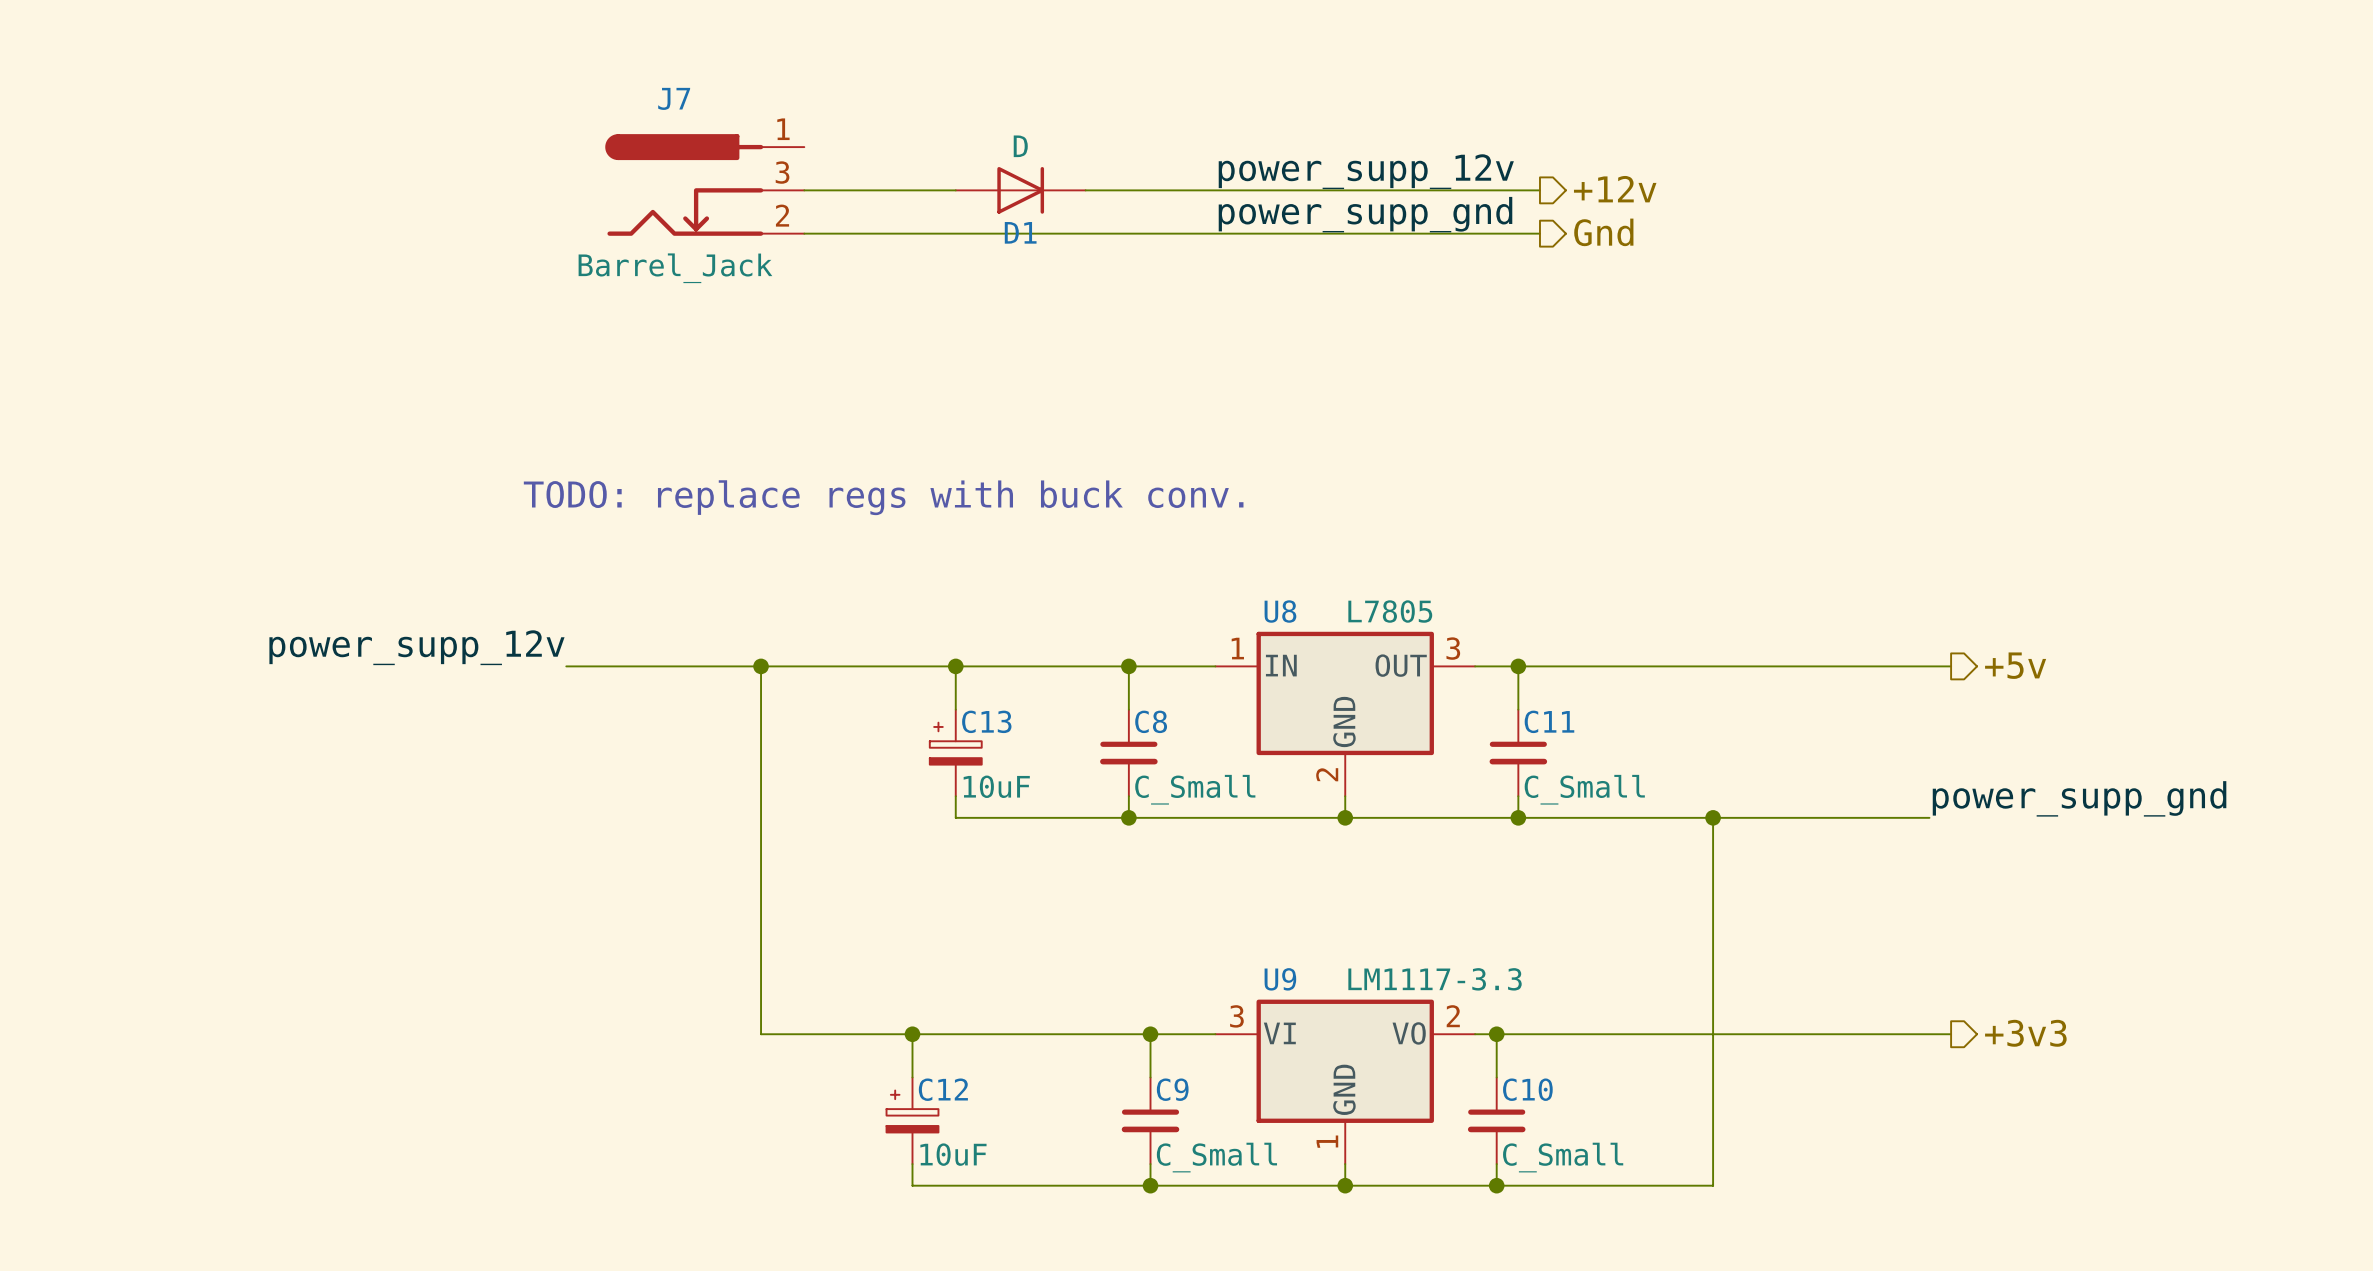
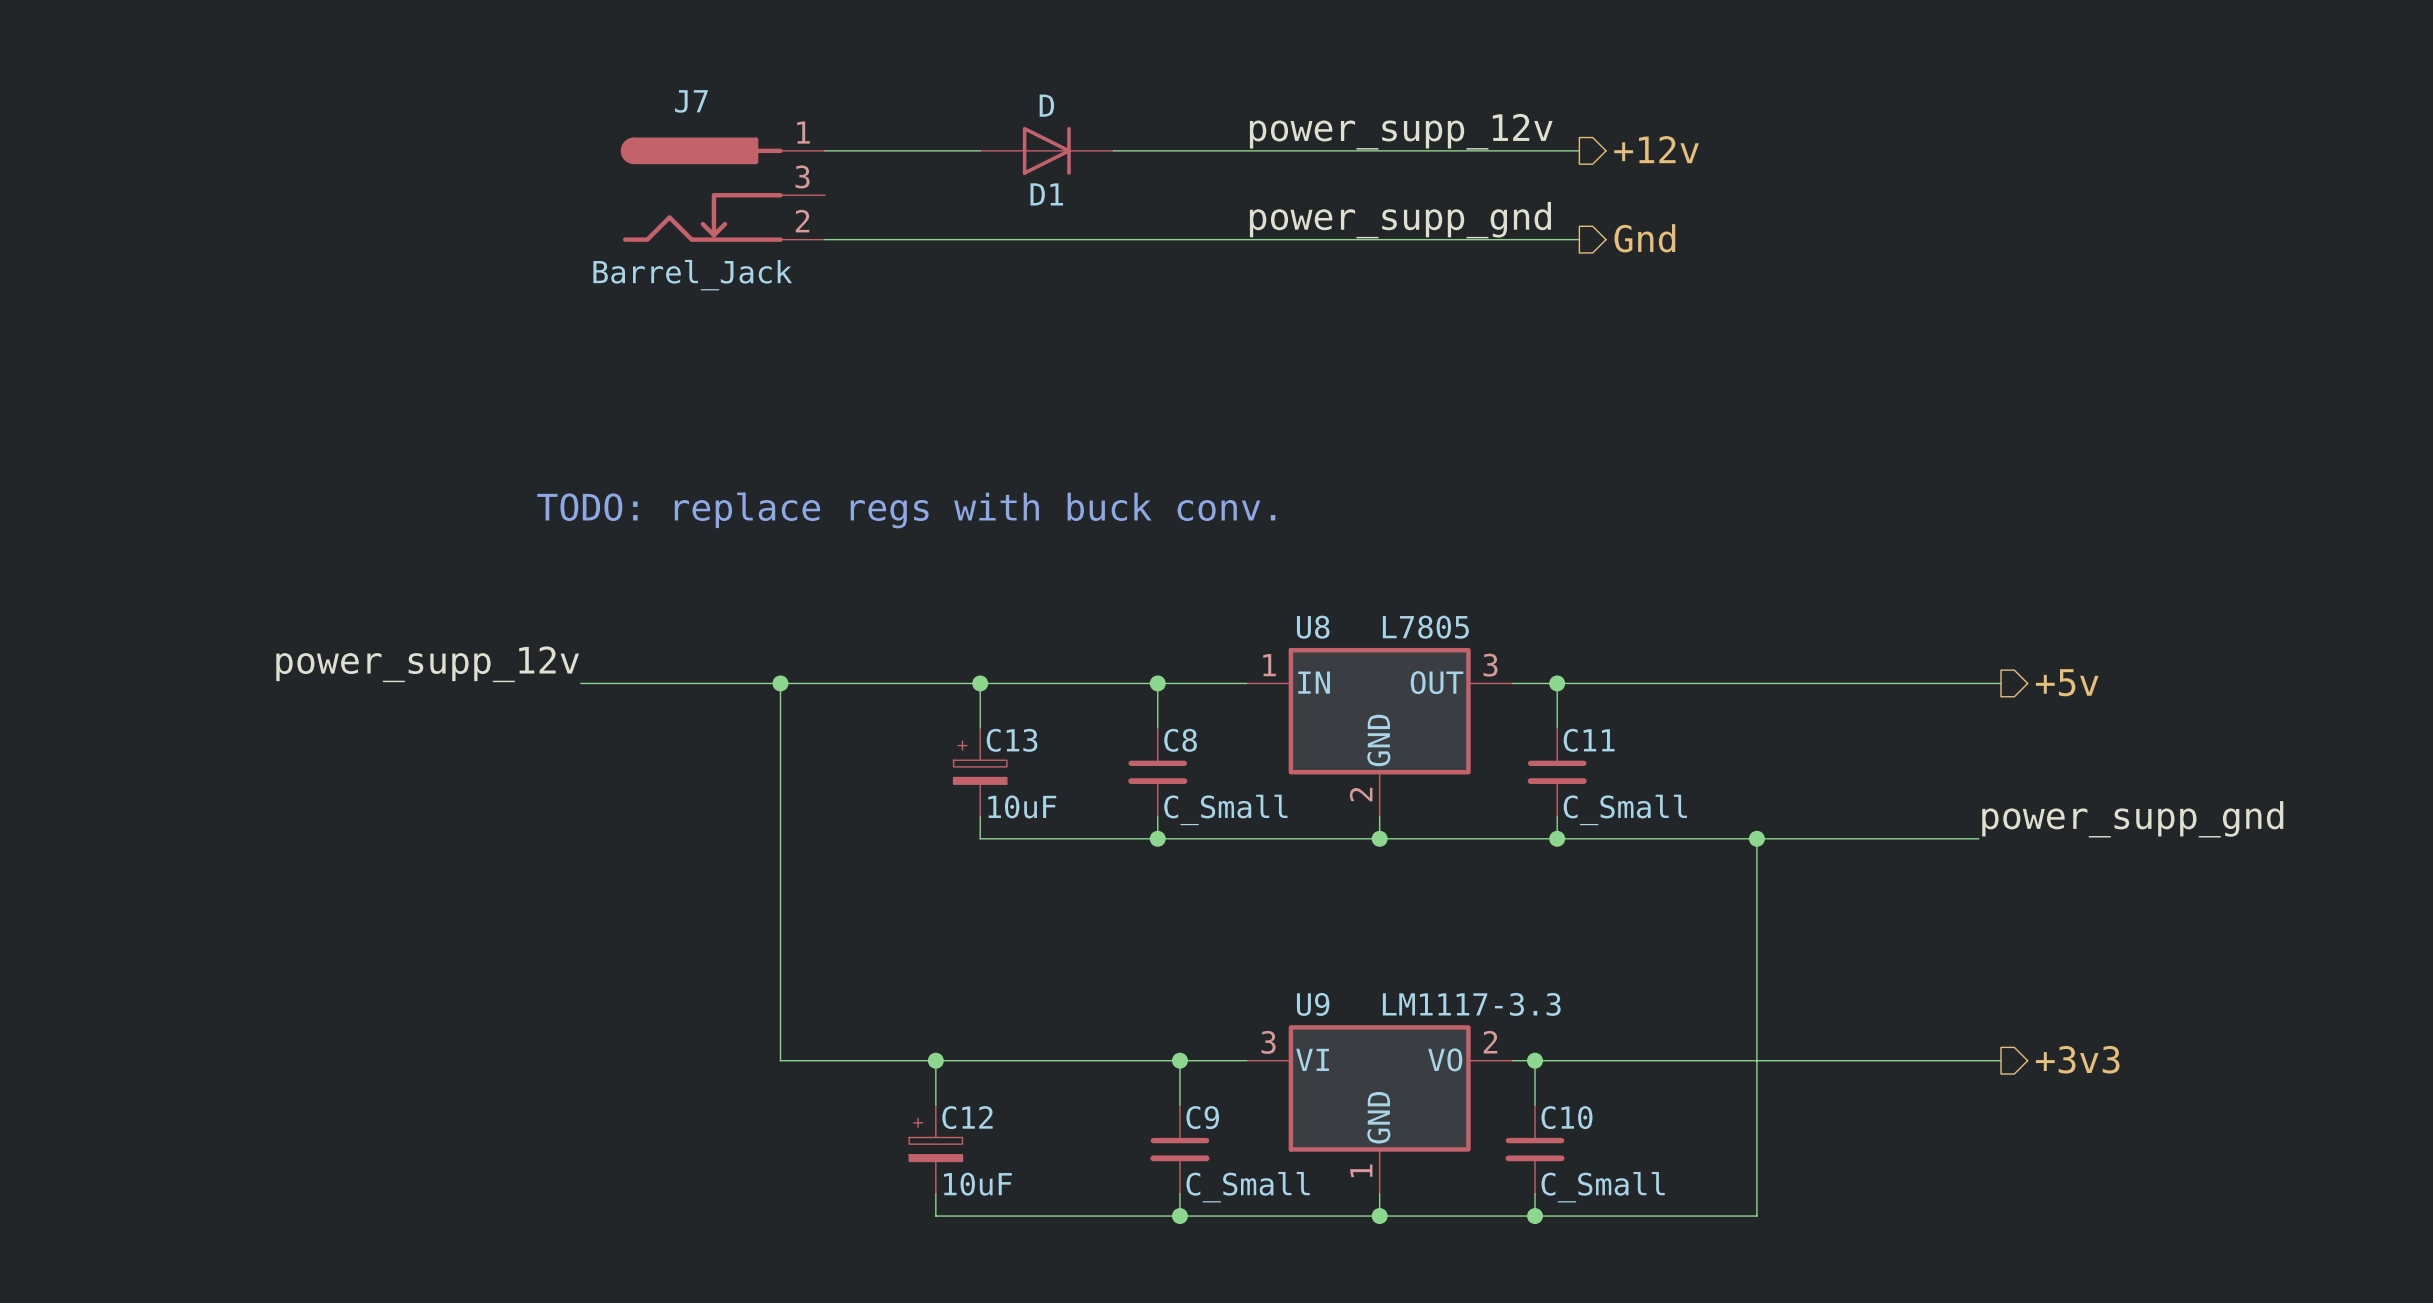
label position: power_supp_12v (1366, 171) -> power_supp_12v (1401, 131)
hierarchical label position: +12v (1615, 189) -> +12v (1656, 149)
wire: (804, 190) (955, 190) -> (824, 150) (980, 150)
D1 position: (1020, 190) -> (1046, 150)
wire: (1085, 190) (1539, 190) -> (1113, 150) (1579, 150)

